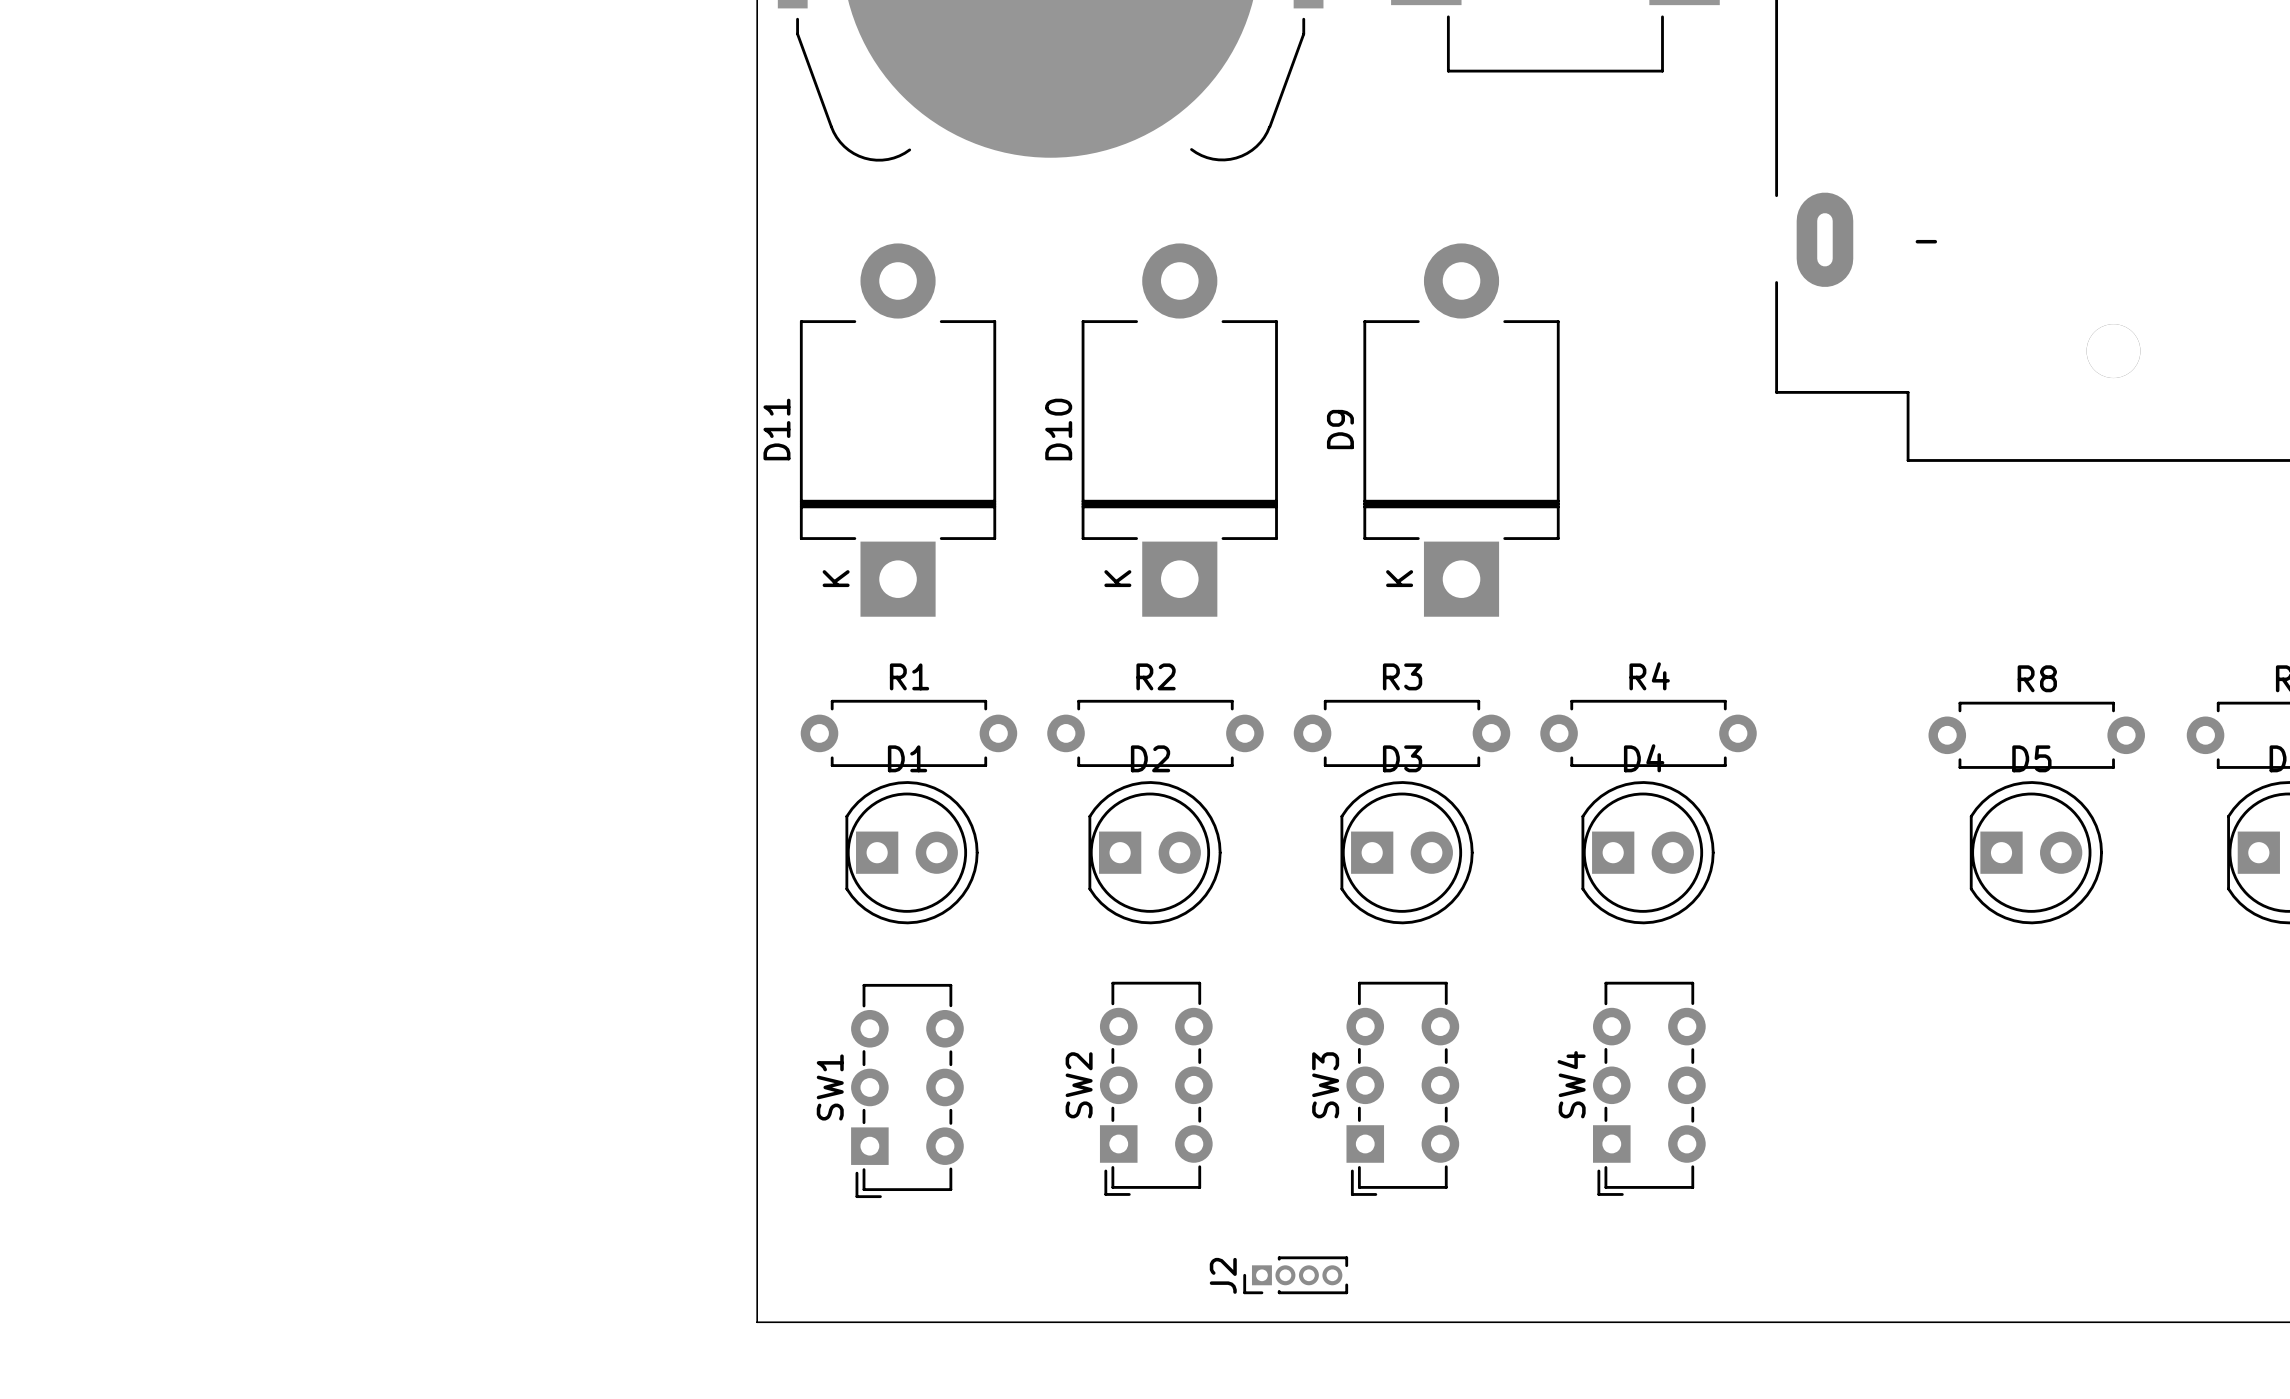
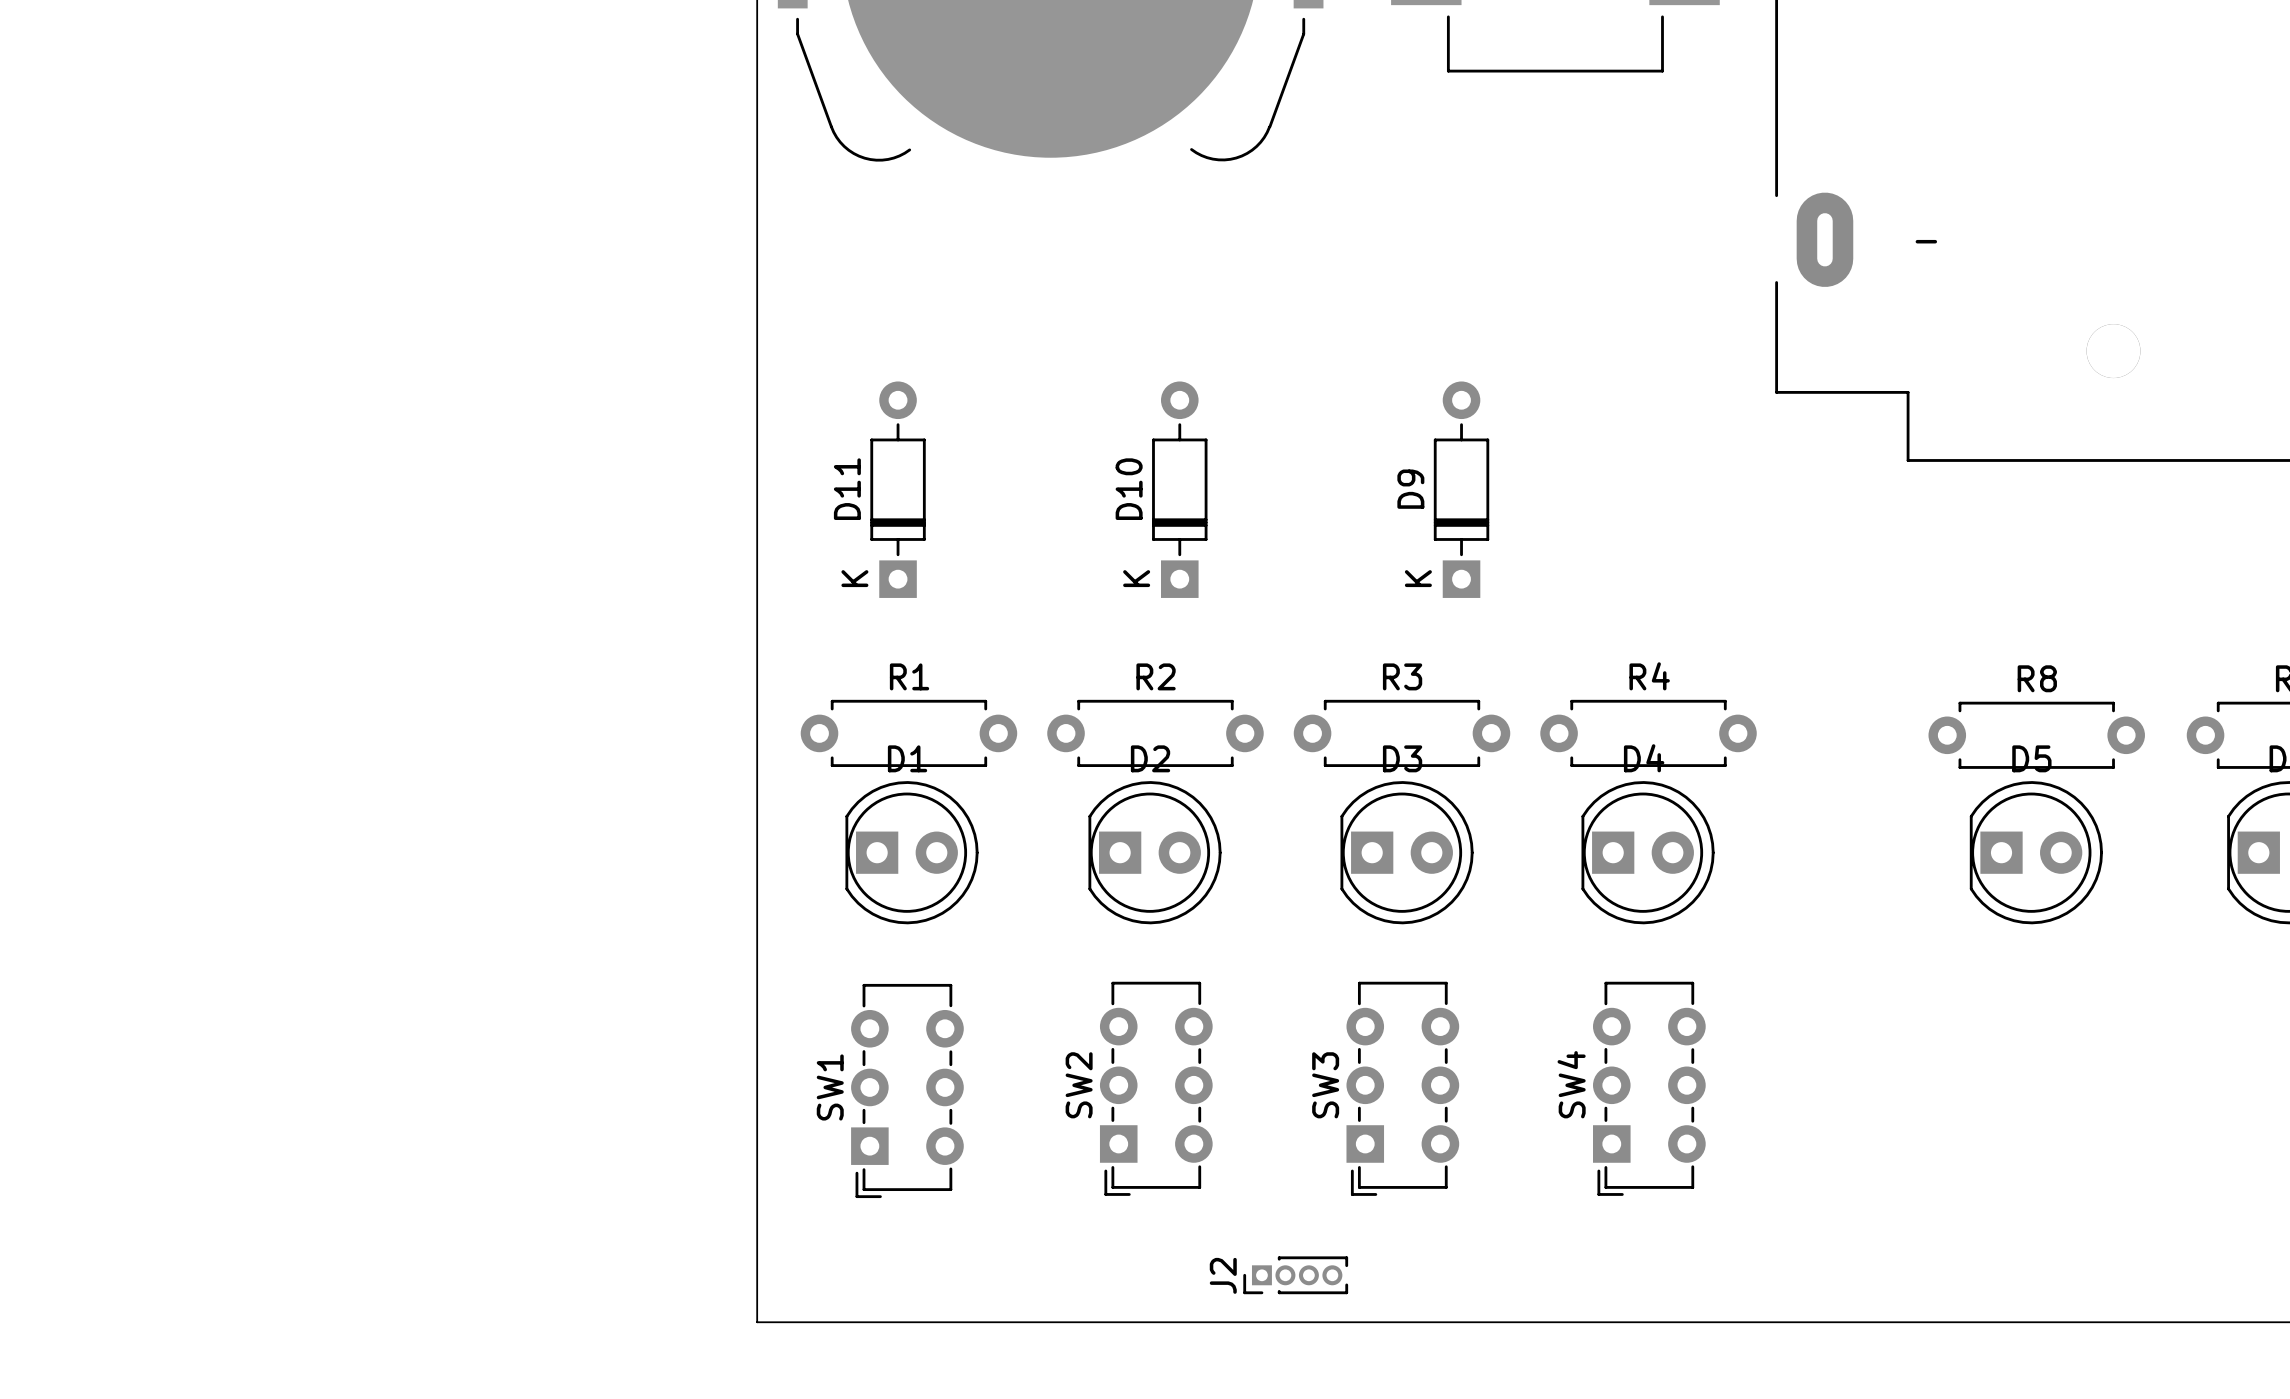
D11 footprint: [799, 243, 997, 617] -> [870, 381, 926, 598]
D10 footprint: [1081, 243, 1278, 617] -> [1152, 381, 1208, 598]
D9 footprint: [1363, 243, 1560, 617] -> [1433, 381, 1490, 598]
D11 name position: D11 (776, 429) -> D11 (847, 489)
D10 name position: D10 (1058, 429) -> D10 (1129, 489)
D9 name position: D9 (1340, 429) -> D9 (1410, 489)

